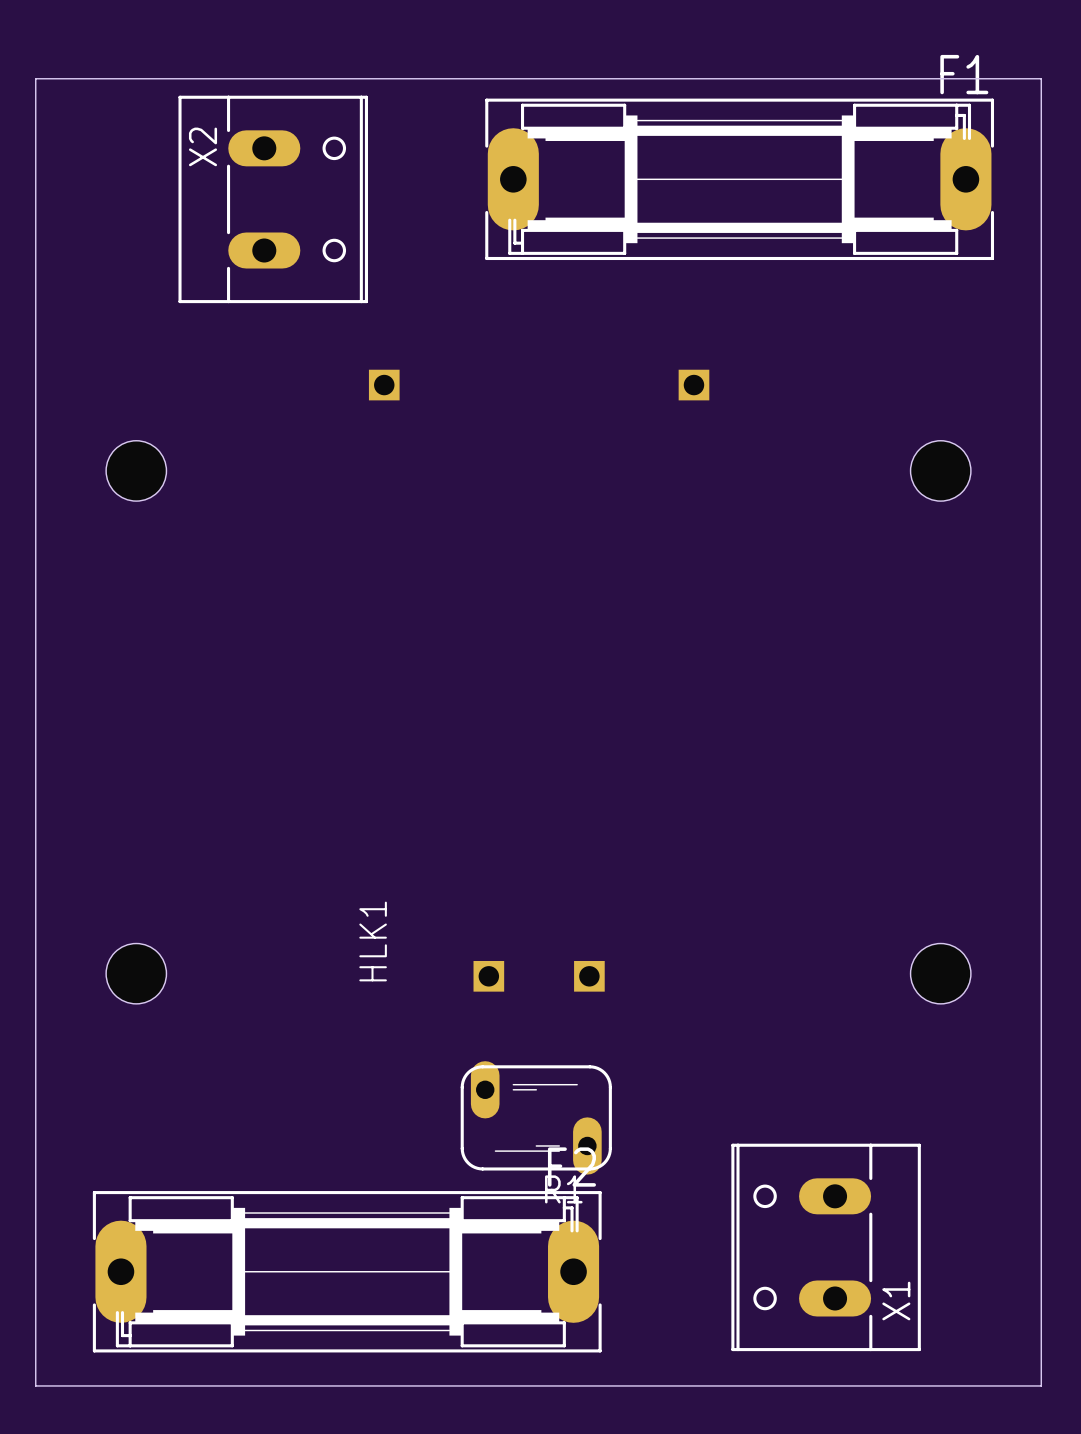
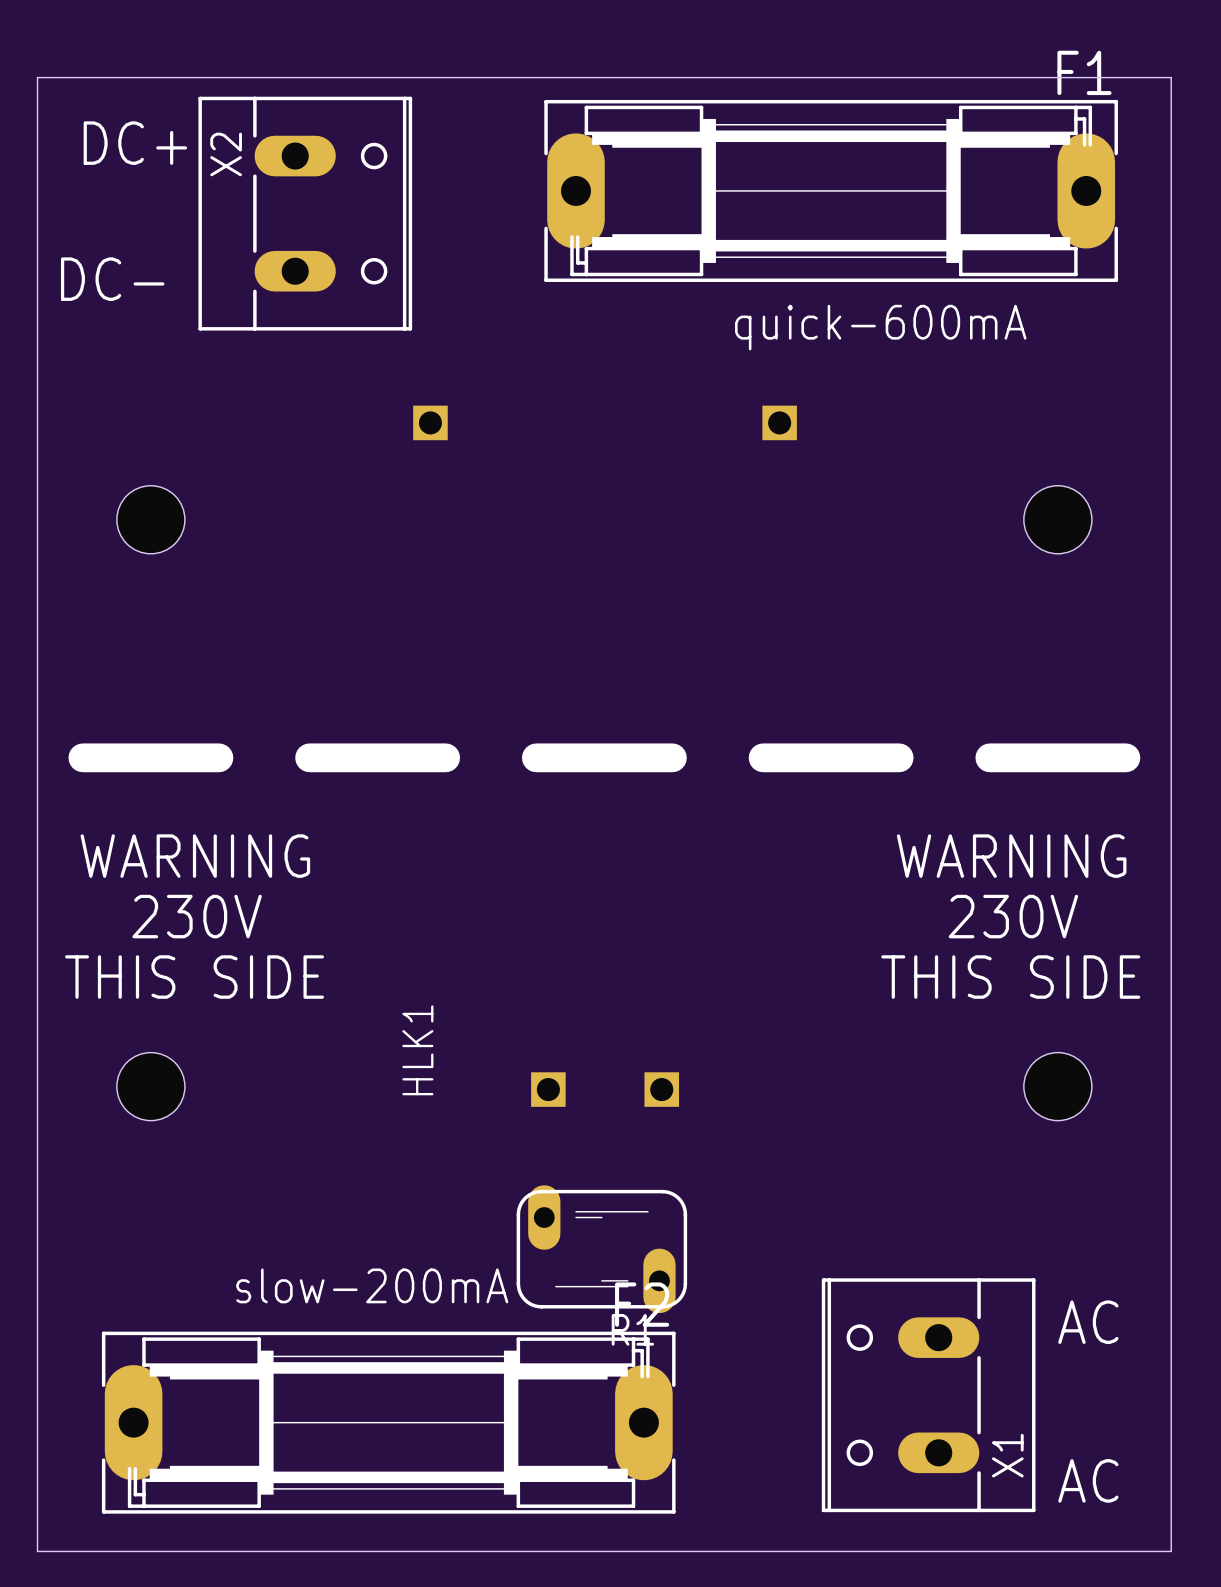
text: none -> DC+ (135, 143)
text: none -> DC- (112, 279)
text: none -> quick-600mA (880, 327)
line: none -> (82, 757) (218, 757)
line: none -> (309, 757) (445, 757)
line: none -> (536, 757) (672, 757)
line: none -> (763, 757) (899, 757)
line: none -> (989, 757) (1125, 757)
text: none -> WARNING (195, 856)
text: none -> WARNING (1011, 856)
text: none -> 230V (197, 916)
text: none -> 230V (1013, 916)
text: none -> THIS SIDE (194, 977)
text: none -> THIS SIDE (1010, 977)
text: none -> slow-200mA (372, 1285)
text: none -> AC (1088, 1322)
text: none -> AC (1088, 1480)

